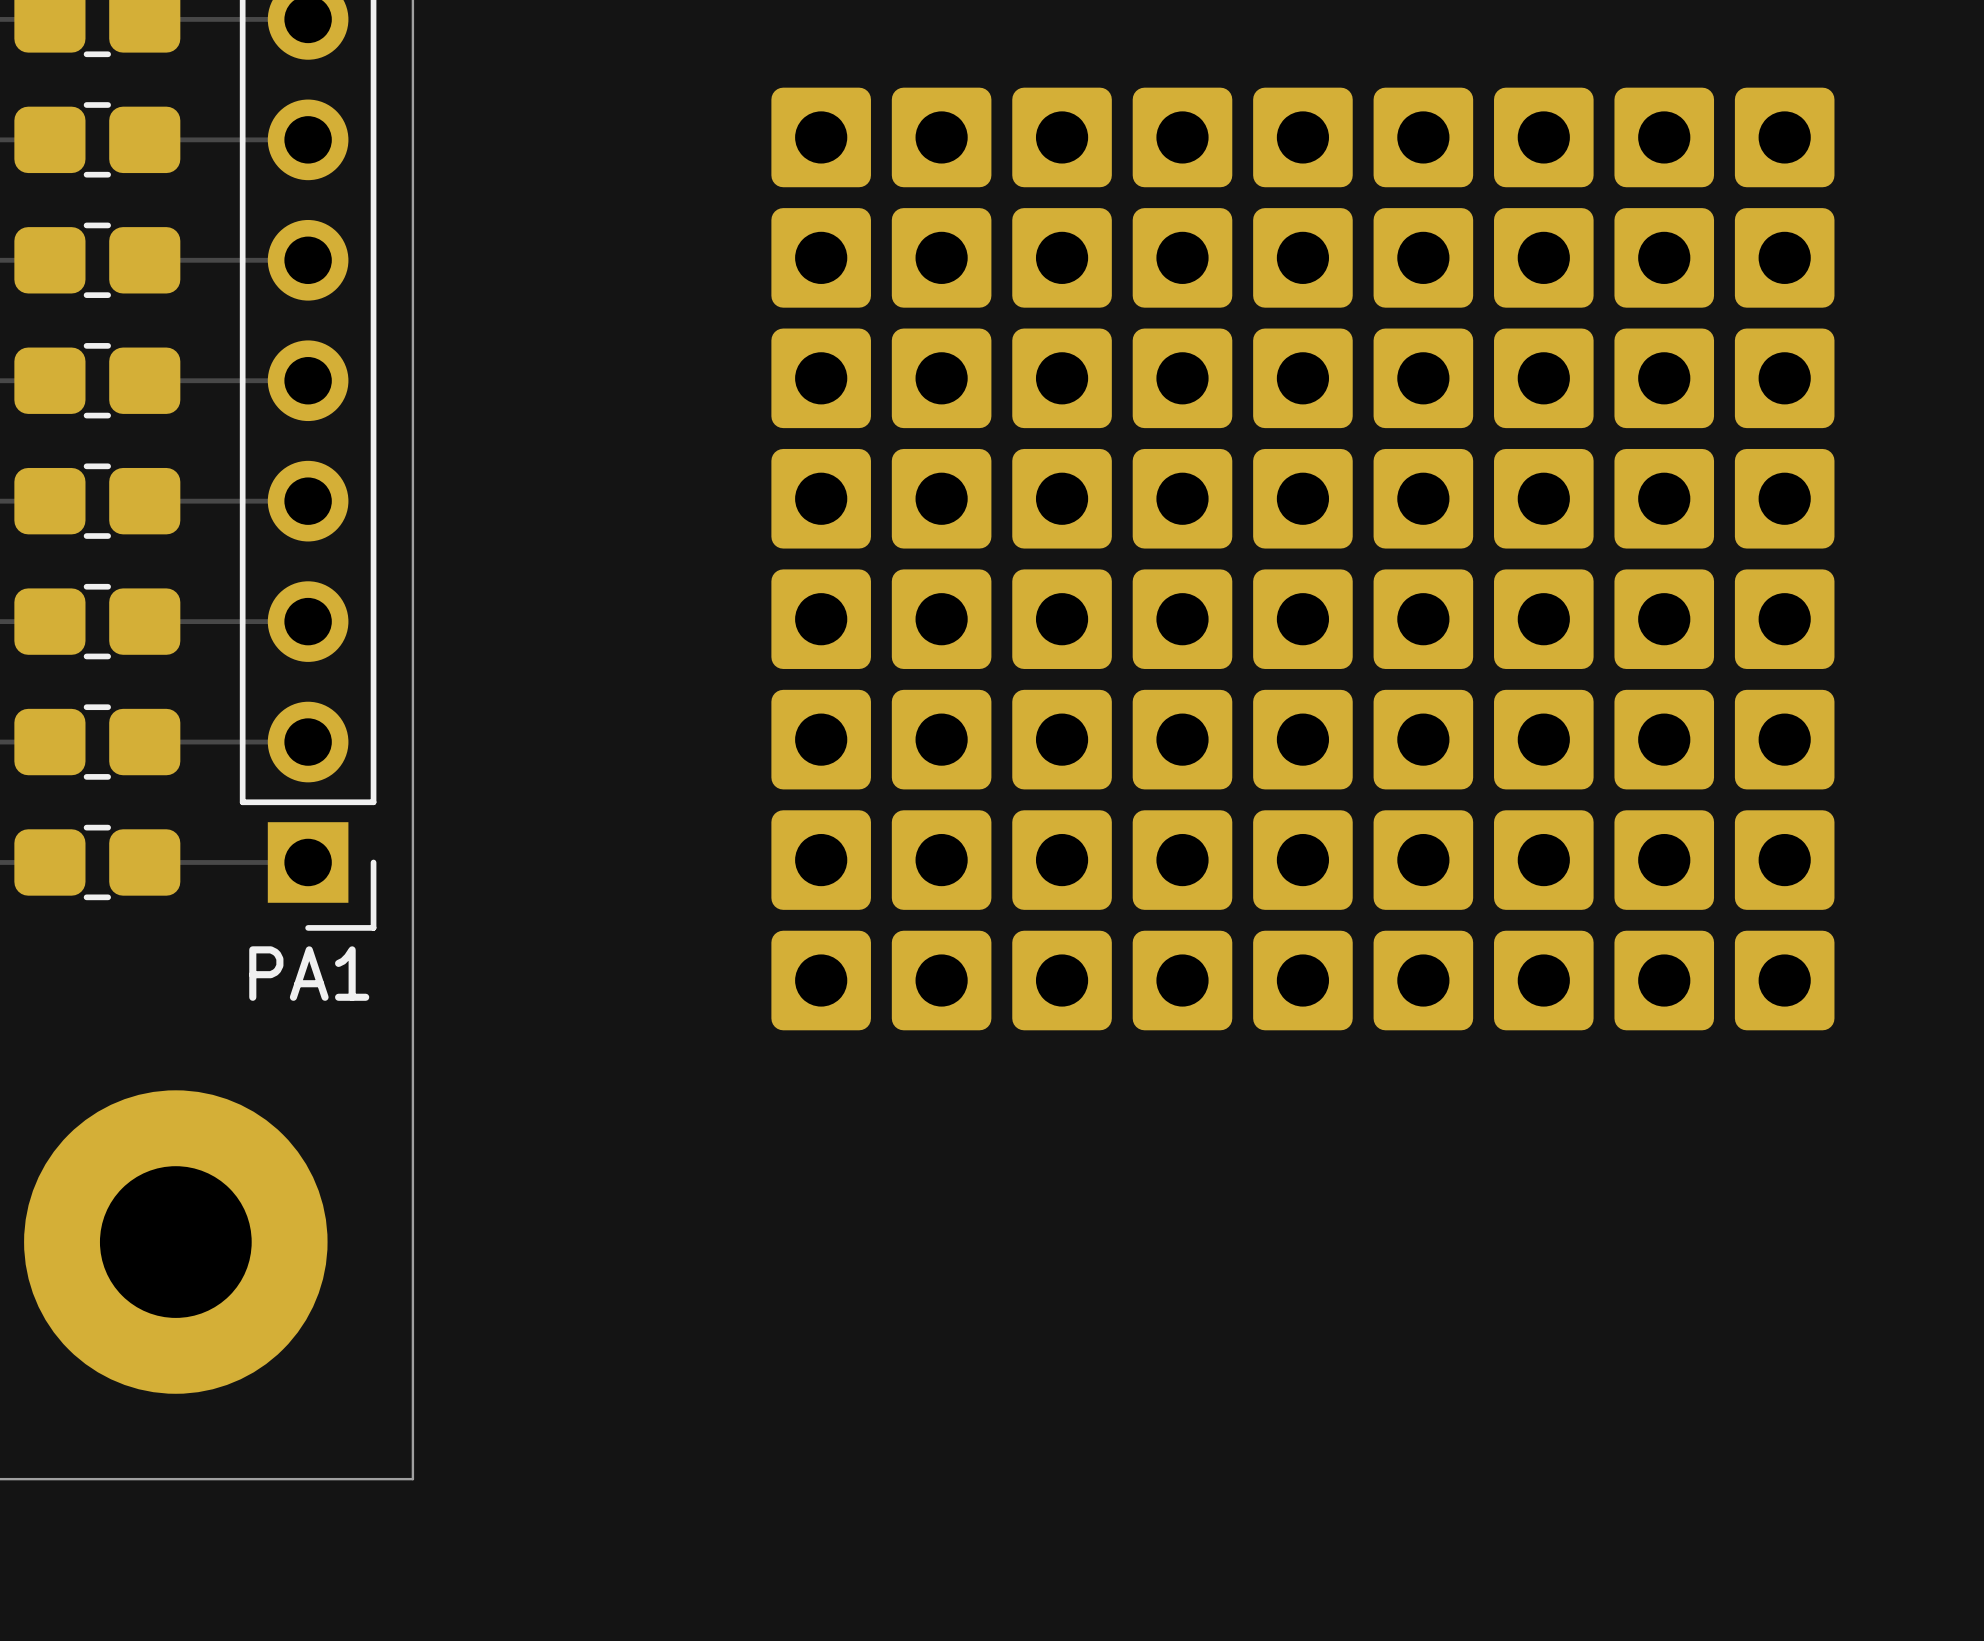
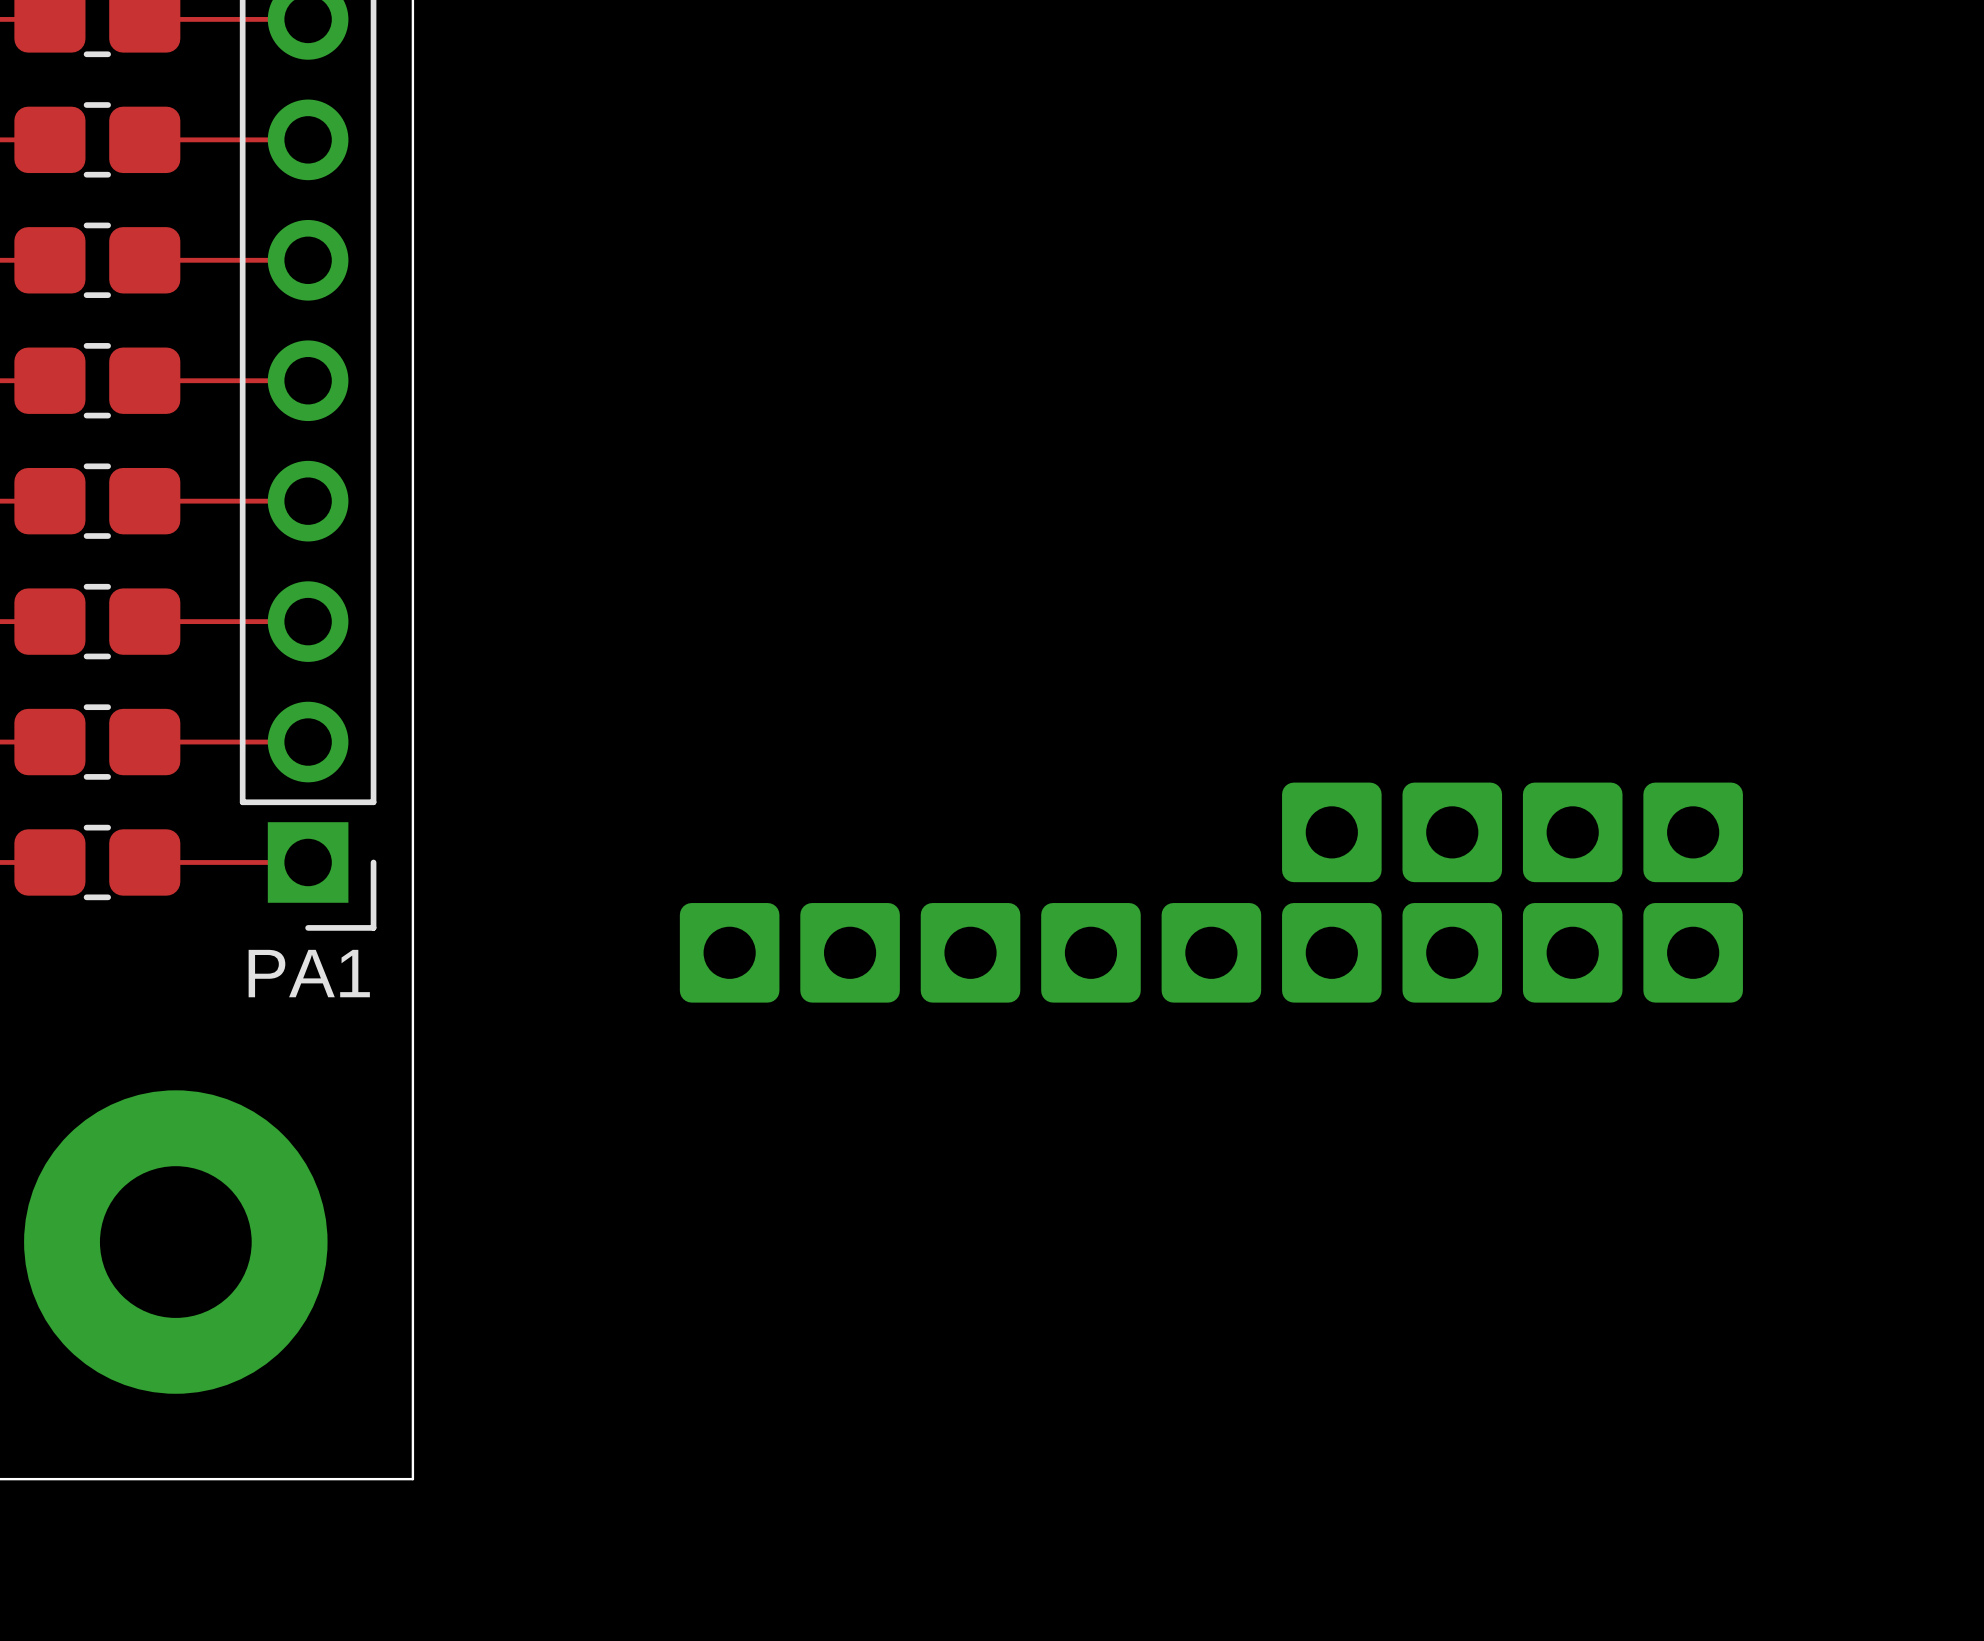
part: (821, 137) -> none
part: (941, 137) -> none
part: (1062, 137) -> none
part: (1182, 137) -> none
part: (1302, 137) -> none
part: (1423, 137) -> none
part: (1543, 137) -> none
part: (1664, 137) -> none
part: (1784, 137) -> none
part: (821, 257) -> none
part: (941, 257) -> none
part: (1062, 257) -> none
part: (1182, 257) -> none
part: (1302, 257) -> none
part: (1423, 257) -> none
part: (1543, 257) -> none
part: (1664, 257) -> none
part: (1784, 257) -> none
part: (821, 378) -> none
part: (941, 378) -> none
part: (1062, 378) -> none
part: (1182, 378) -> none
part: (1302, 378) -> none
part: (1423, 378) -> none
part: (1543, 378) -> none
part: (1664, 378) -> none
part: (1784, 378) -> none
part: (821, 498) -> none
part: (941, 498) -> none
part: (1062, 498) -> none
part: (1182, 498) -> none
part: (1302, 498) -> none
part: (1423, 498) -> none
part: (1543, 498) -> none
part: (1664, 498) -> none
part: (1784, 498) -> none
part: (821, 619) -> none
part: (941, 619) -> none
part: (1062, 619) -> none
part: (1182, 619) -> none
part: (1302, 619) -> none
part: (1423, 619) -> none
part: (1543, 619) -> none
part: (1664, 619) -> none
part: (1784, 619) -> none
part: (821, 739) -> none
part: (941, 739) -> none
part: (1062, 739) -> none
part: (1182, 739) -> none
part: (1302, 739) -> none
part: (1423, 739) -> none
part: (1543, 739) -> none
part: (1664, 739) -> none
part: (1784, 739) -> none
part: (821, 860) -> none
part: (941, 860) -> none
part: (1062, 860) -> none
part: (1182, 860) -> none
part position: (1302, 860) -> (1331, 832)
part position: (1423, 860) -> (1452, 832)
part position: (1543, 860) -> (1572, 832)
part position: (1664, 860) -> (1693, 832)
part: (1784, 860) -> none
part: none -> (729, 952)
part position: (821, 980) -> (850, 952)
part position: (941, 980) -> (970, 952)
part position: (1062, 980) -> (1090, 952)
part position: (1182, 980) -> (1211, 952)
part position: (1302, 980) -> (1331, 952)
part position: (1423, 980) -> (1452, 952)
part position: (1543, 980) -> (1572, 952)
part position: (1664, 980) -> (1693, 952)
part: (1784, 980) -> none

